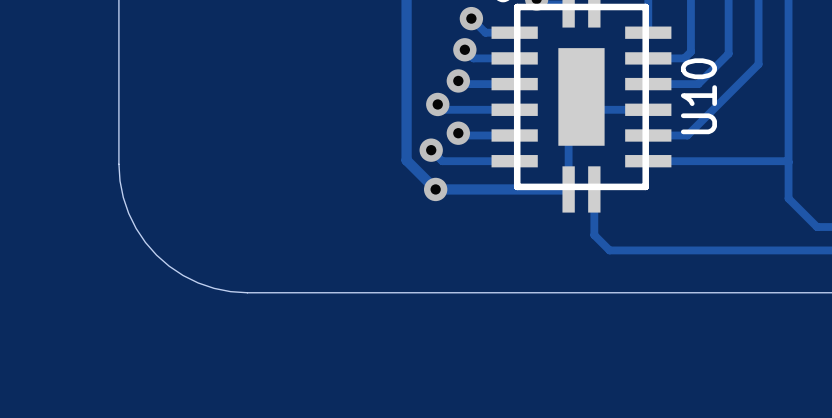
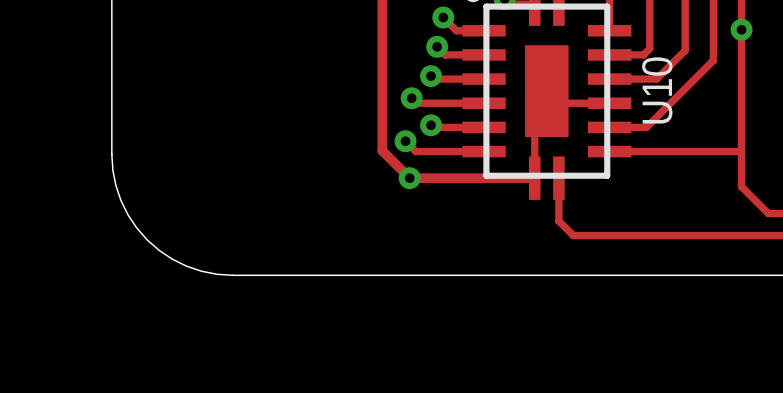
via: none -> (741, 29)

